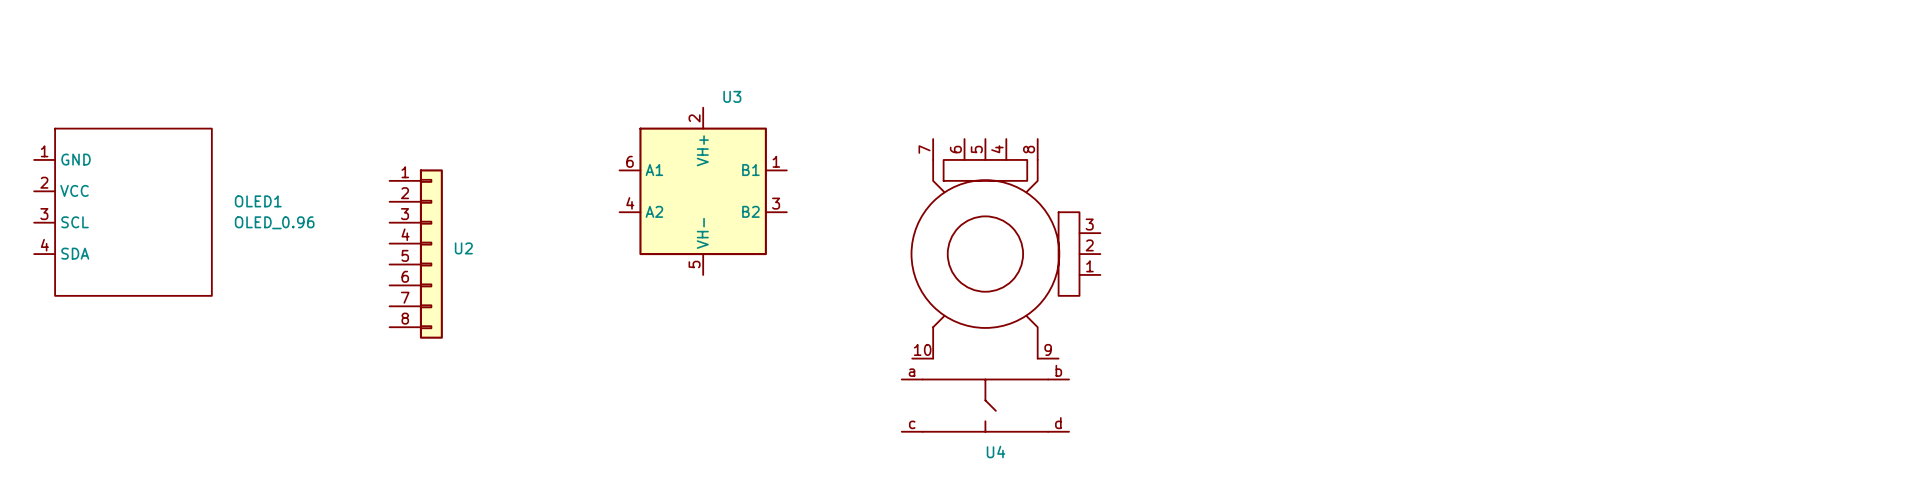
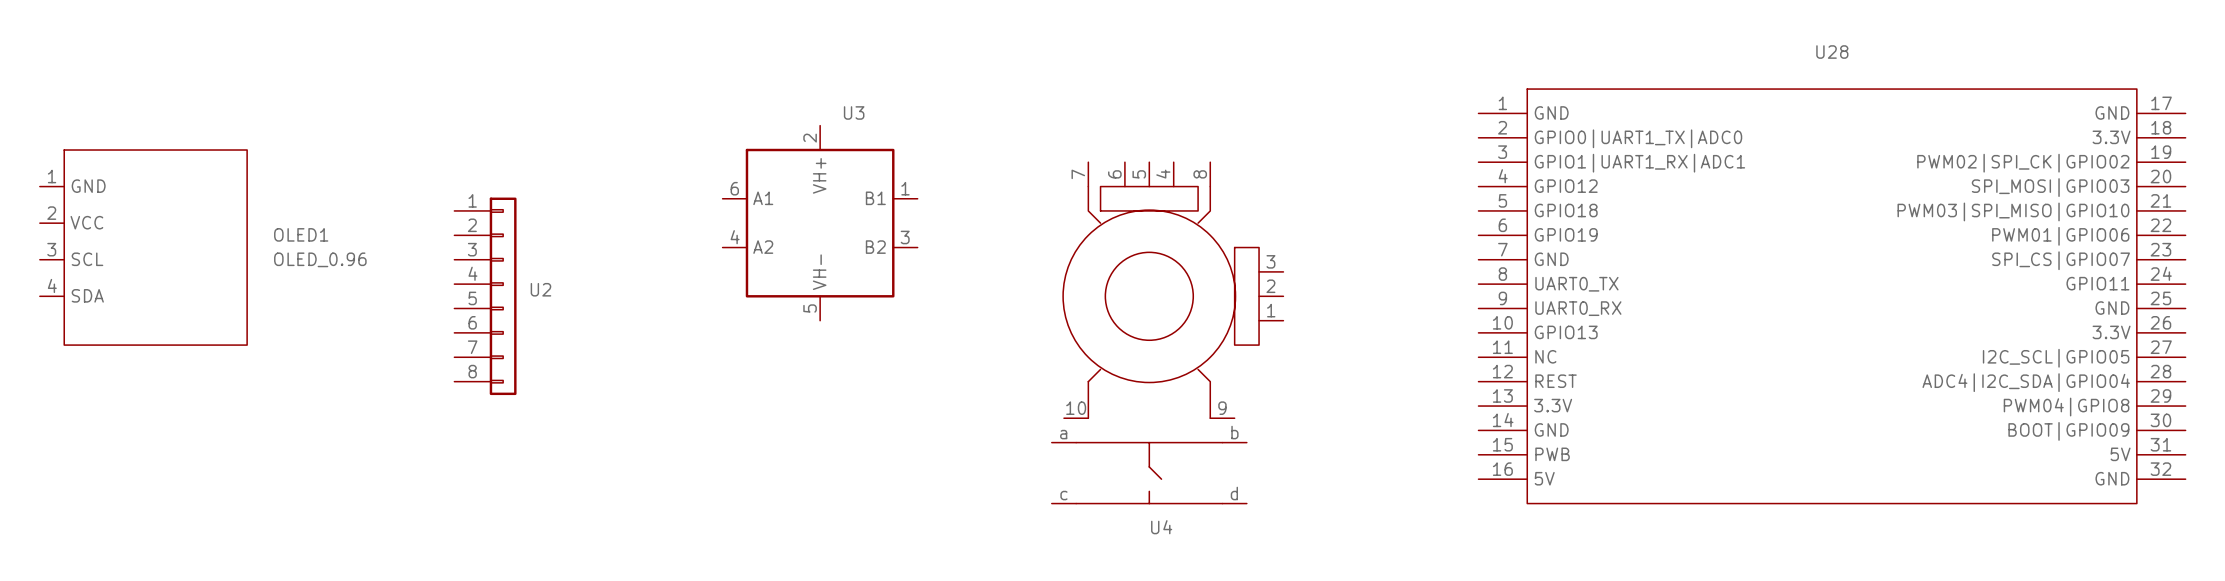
U28: none -> (1832, 296)

